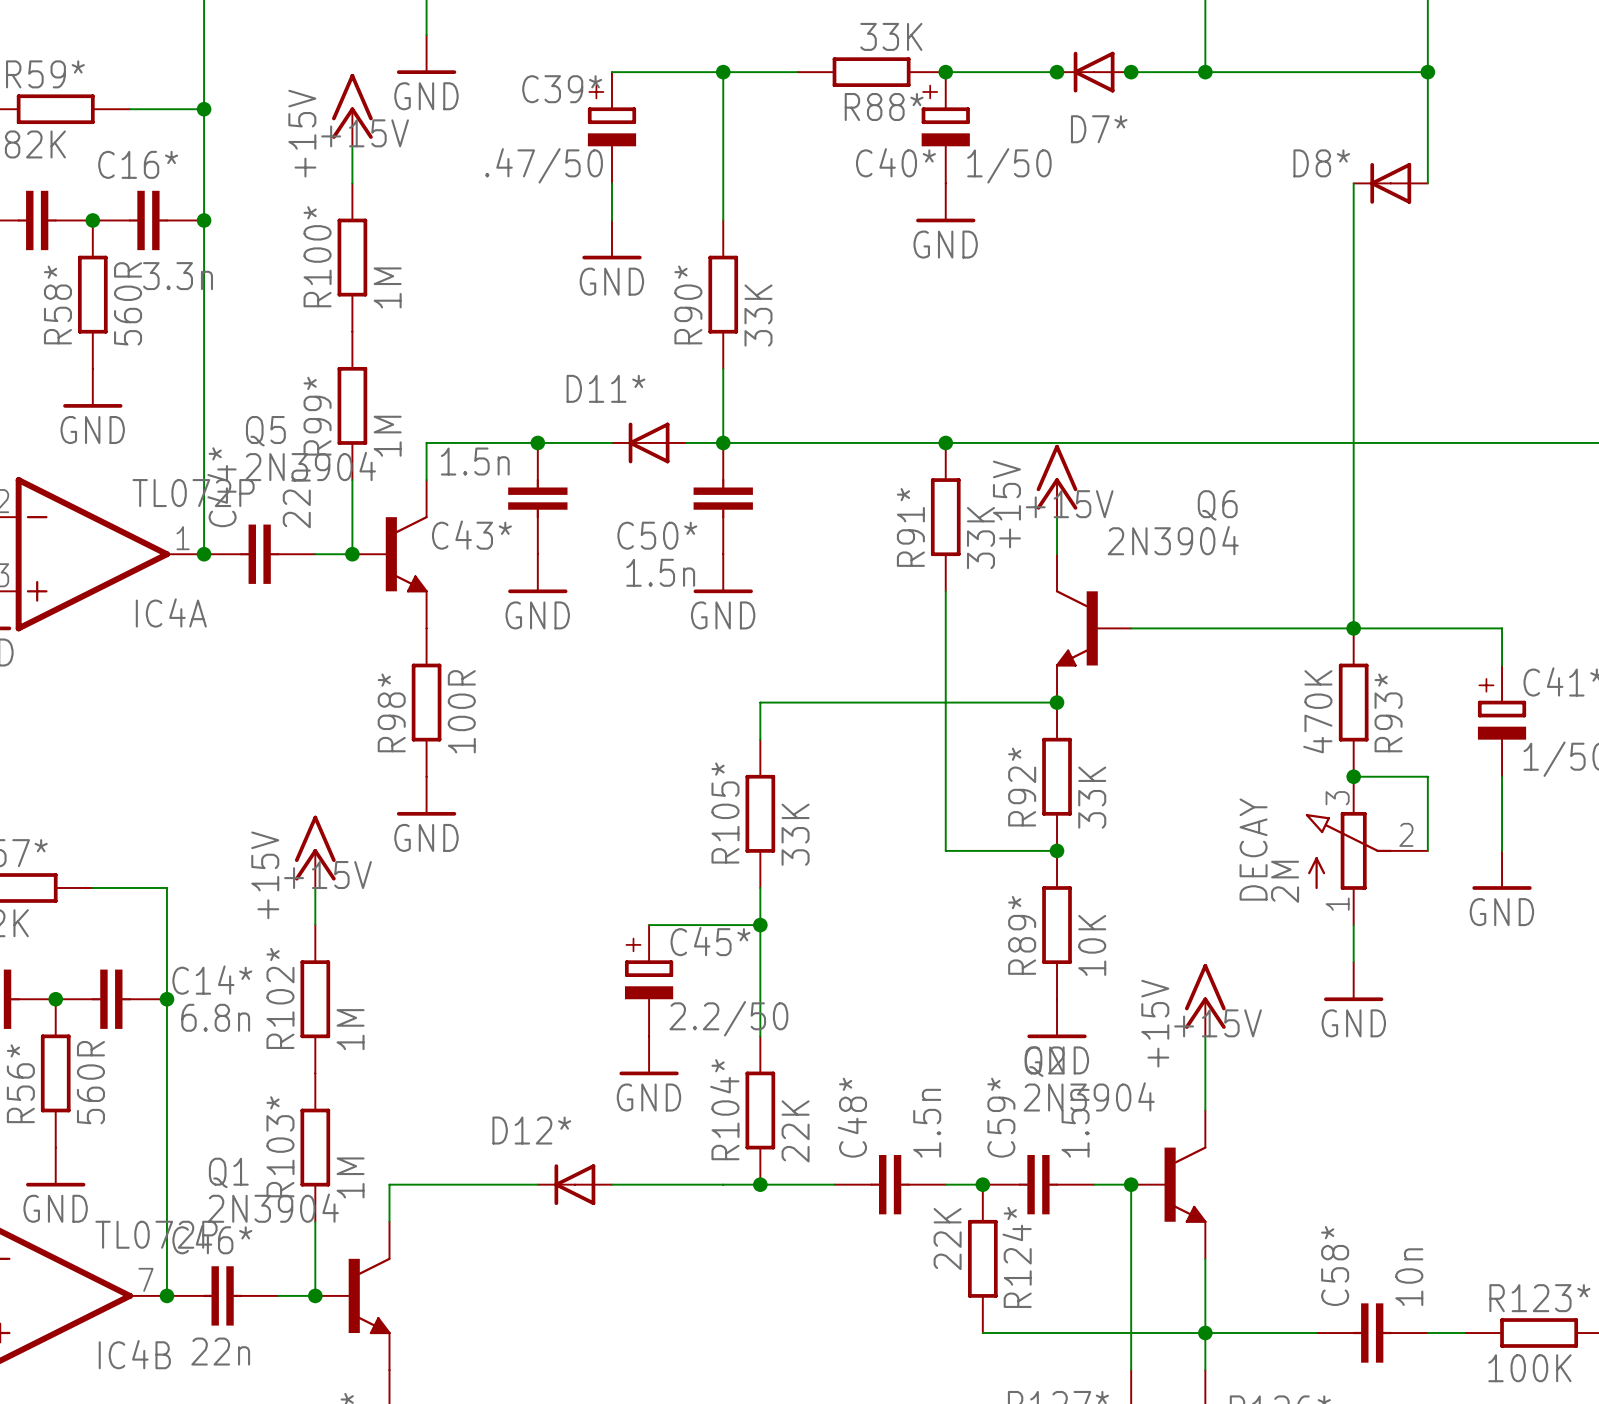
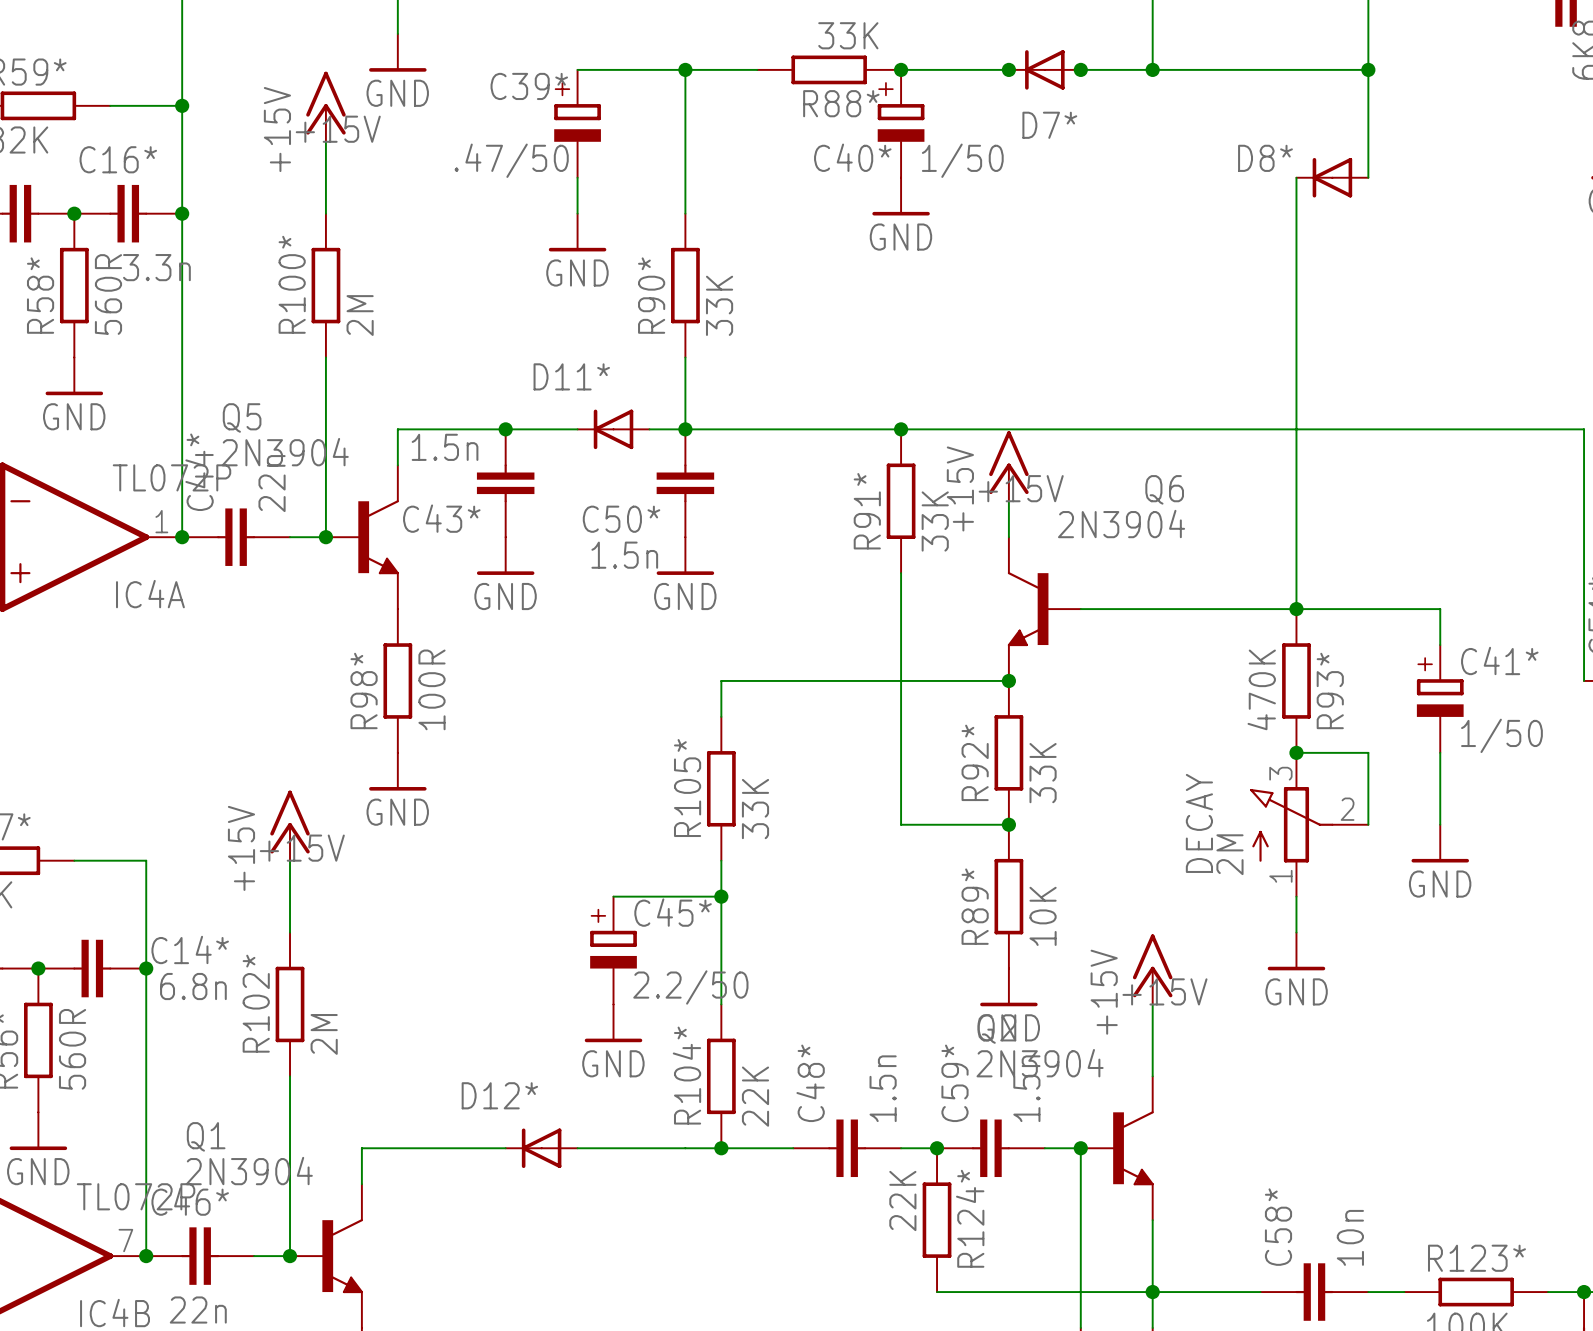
R100* position: (352, 257) -> (325, 285)
R100* value: 1M (387, 287) -> 2M (360, 315)
wire: none -> (325, 357) (325, 465)
R99*: 1M (352, 405) -> none
R102* position: (315, 999) -> (290, 1004)
R102* value: 1M (350, 1029) -> 2M (324, 1034)
wire: none -> (290, 1076) (290, 1184)
R103*: 1M (315, 1147) -> none

